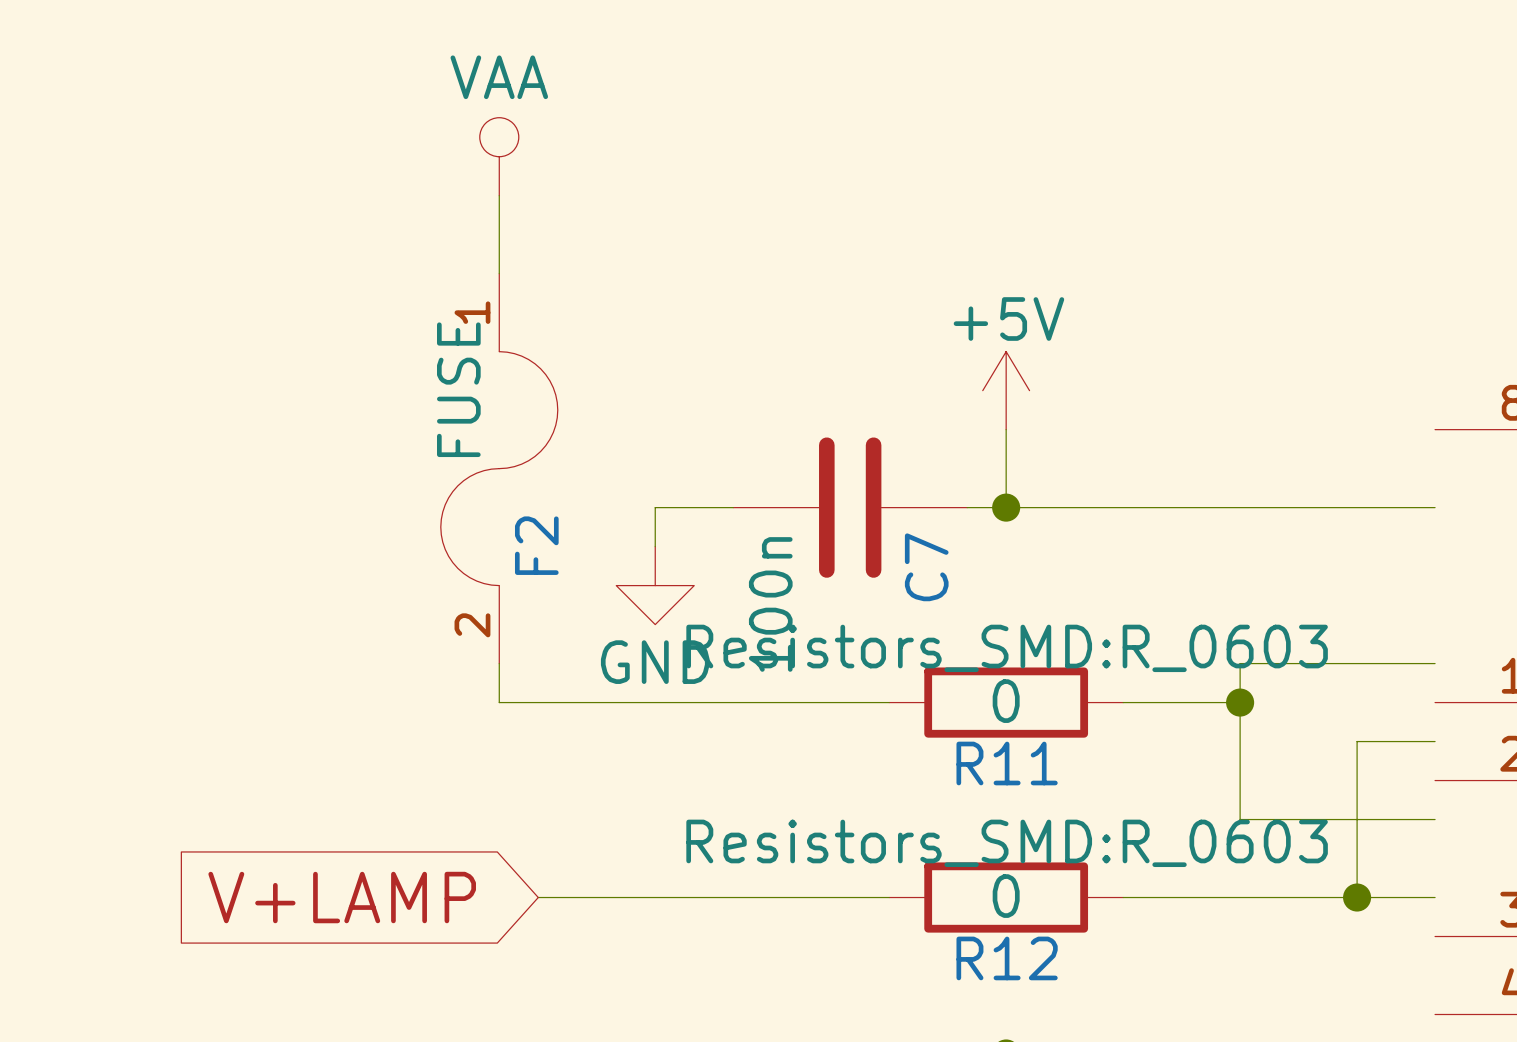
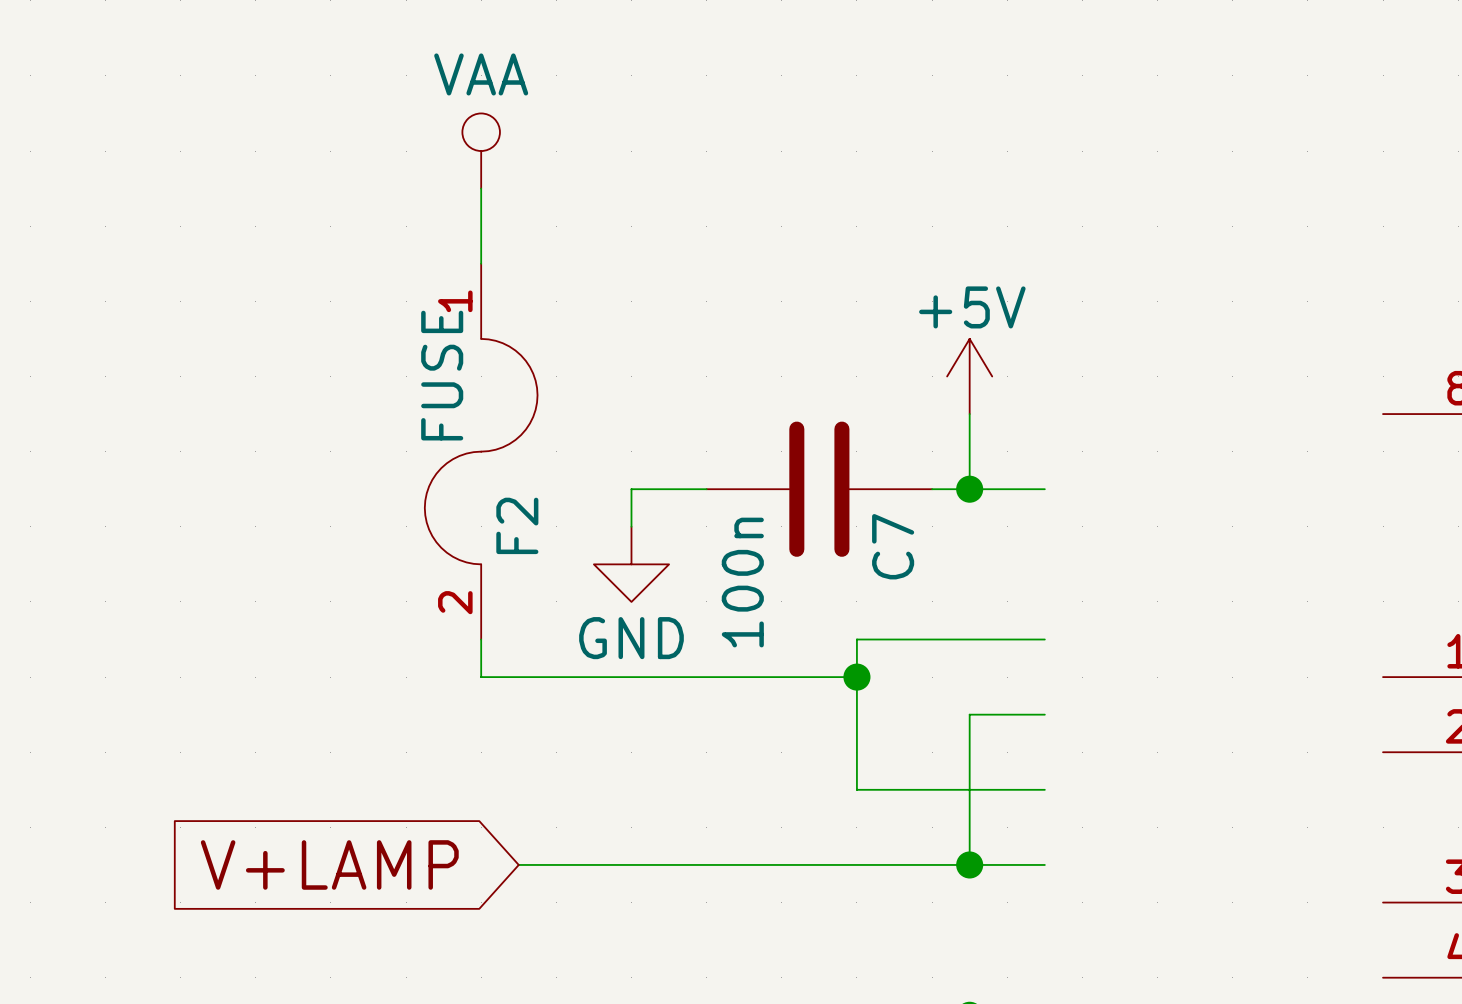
wire: (1084, 507) (1435, 507) -> none
wire: (1435, 663) (1240, 663) (1240, 819) (1435, 819) -> (1044, 639) (856, 639) (856, 789) (1044, 789)
junction: none -> (856, 677)
R11: 0 (1006, 702) -> none
wire: (1123, 702) (1240, 702) -> none
junction: (1240, 702) -> none
wire: (1435, 741) (1357, 741) (1357, 897) -> (1044, 714) (969, 714) (969, 864)
wire: none -> (856, 864) (1044, 864)
R12: 0 (1006, 897) -> none
junction: none -> (969, 864)
wire: (1123, 897) (1435, 897) -> none
junction: (1357, 897) -> none

